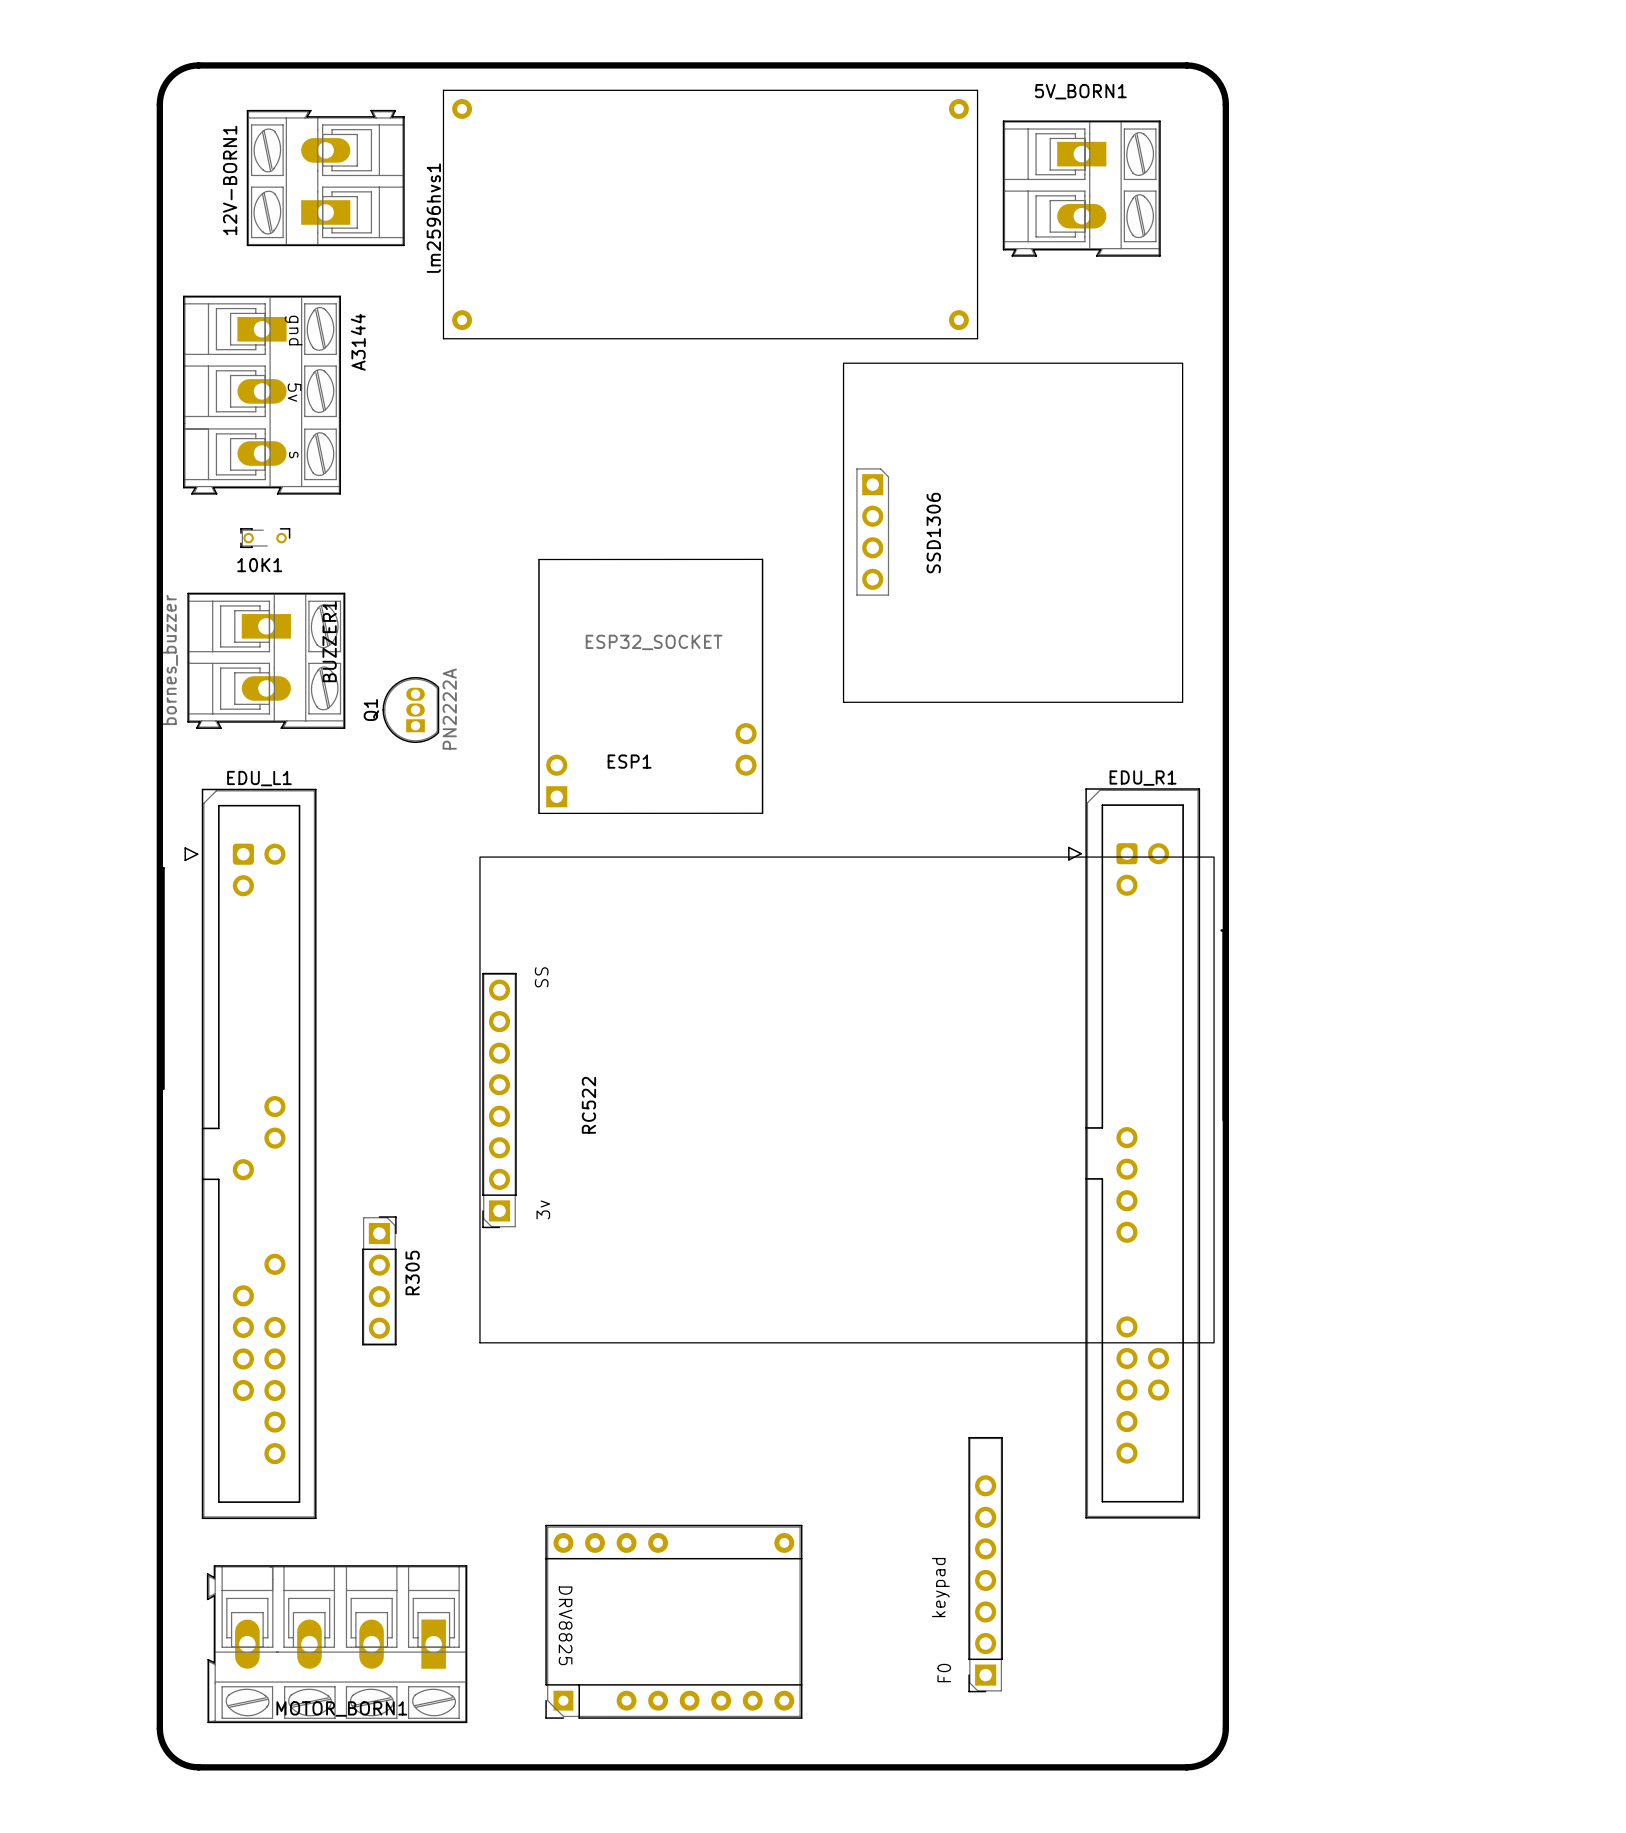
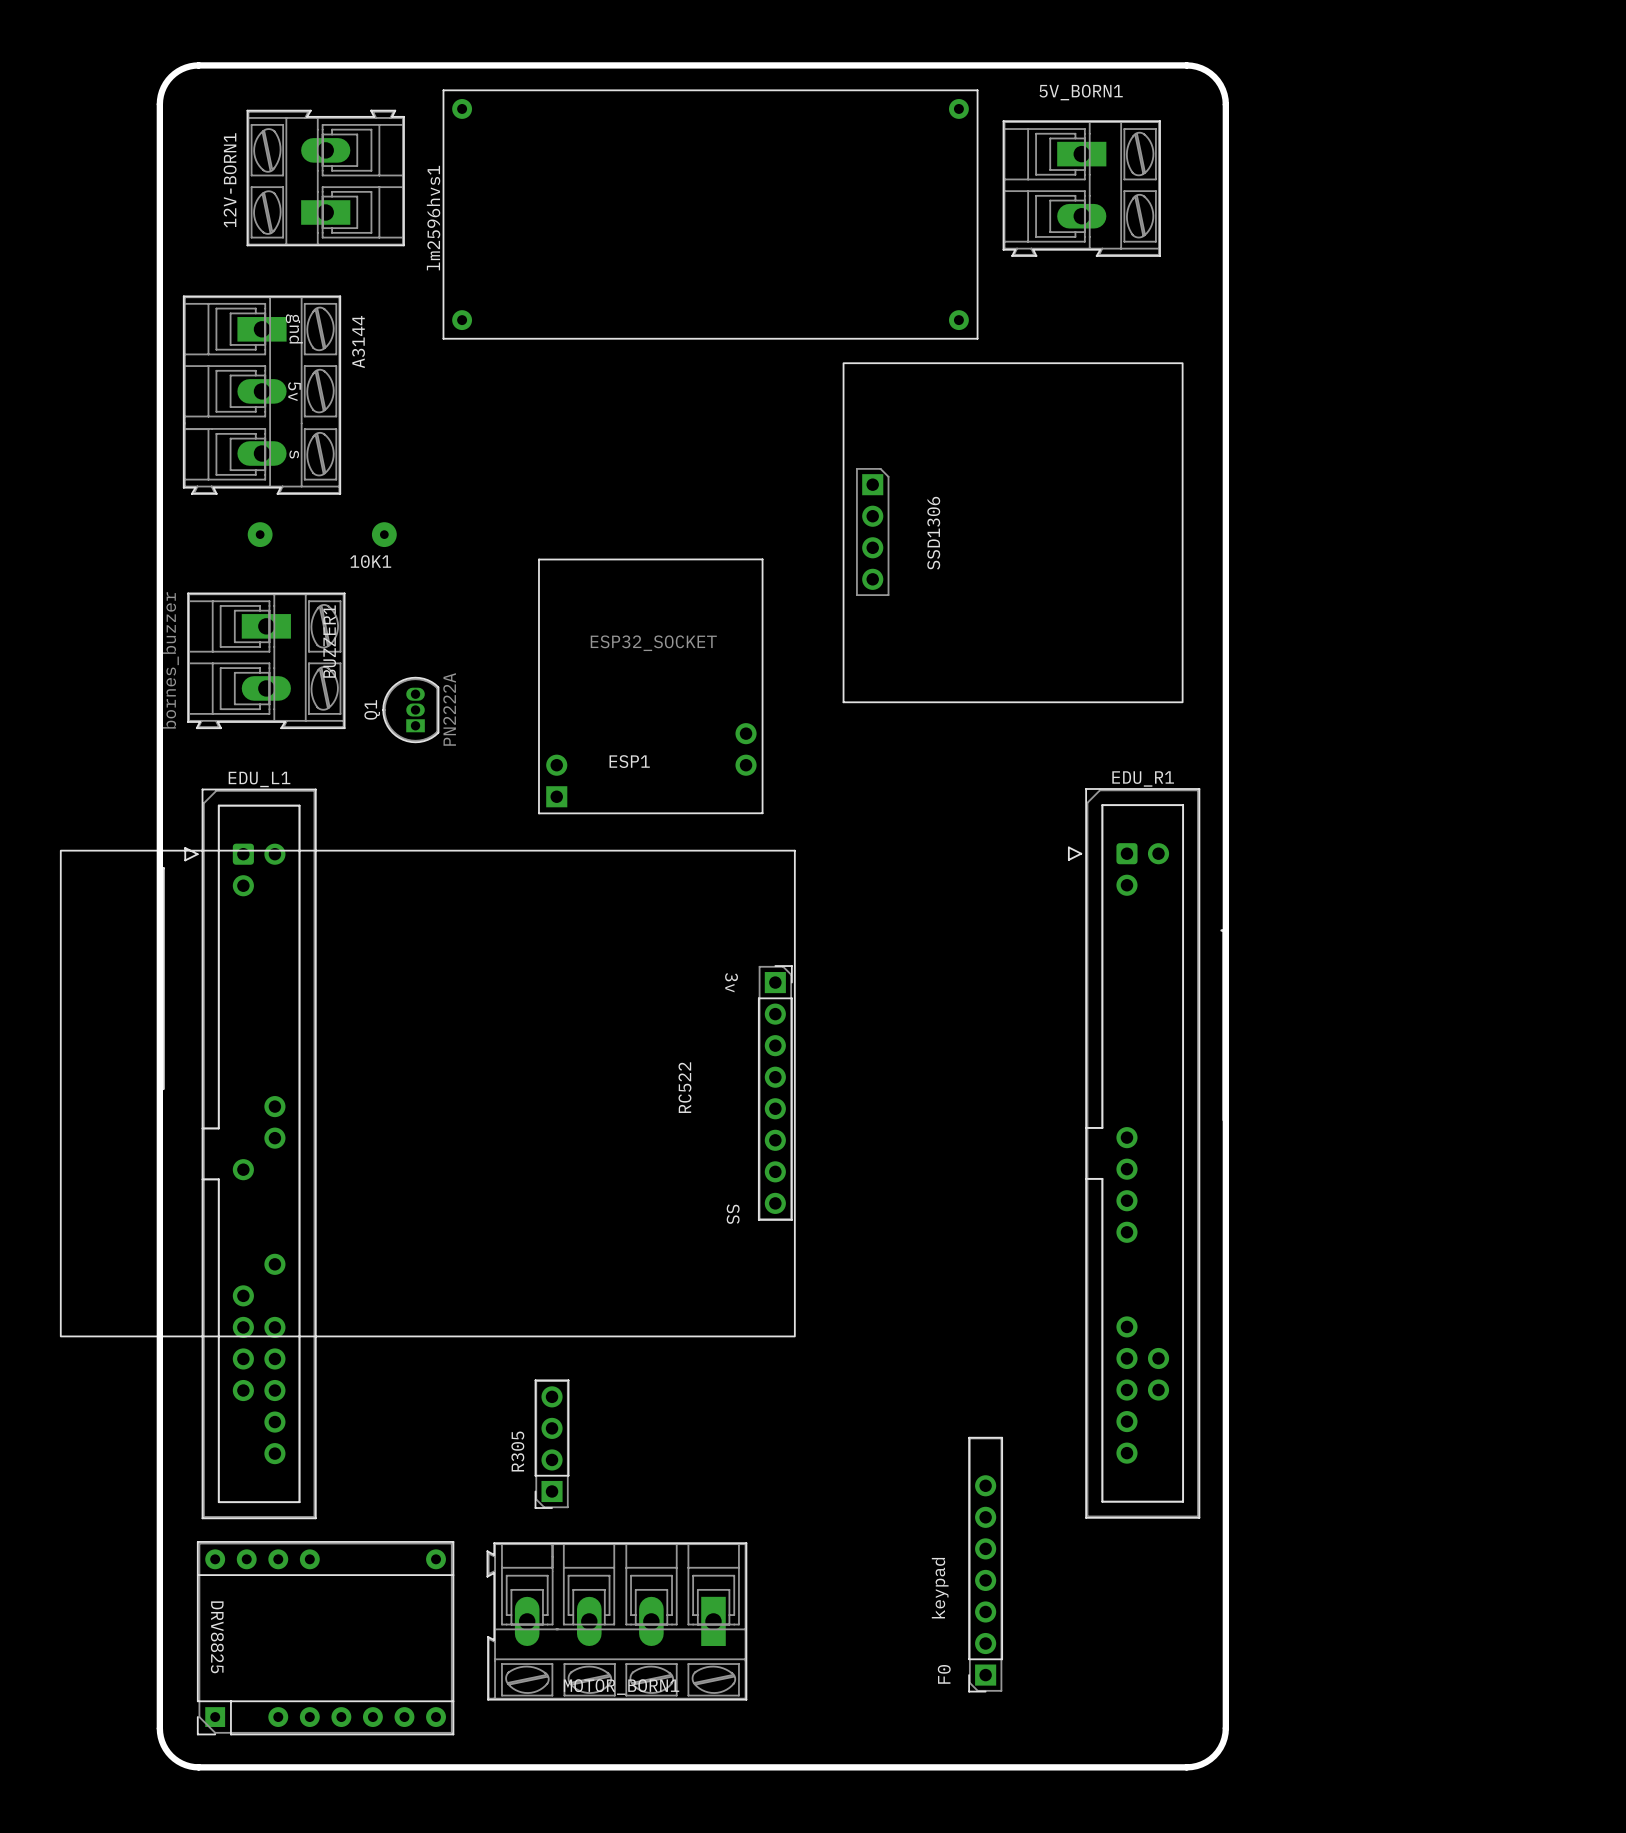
10K1 footprint: [240, 528, 291, 549] -> [247, 522, 397, 548]
10K1 name position: 10K1 (259, 565) -> 10K1 (370, 561)
RC522 rotation: 0° (847, 1099) -> 180° (427, 1093)
R305 rotation: 0° (379, 1280) -> 180° (552, 1444)
R305 position: (379, 1280) -> (552, 1444)
part: (673, 1621) -> none
part: none -> (325, 1638)
MOTOR_BORN1 position: (337, 1644) -> (616, 1621)

